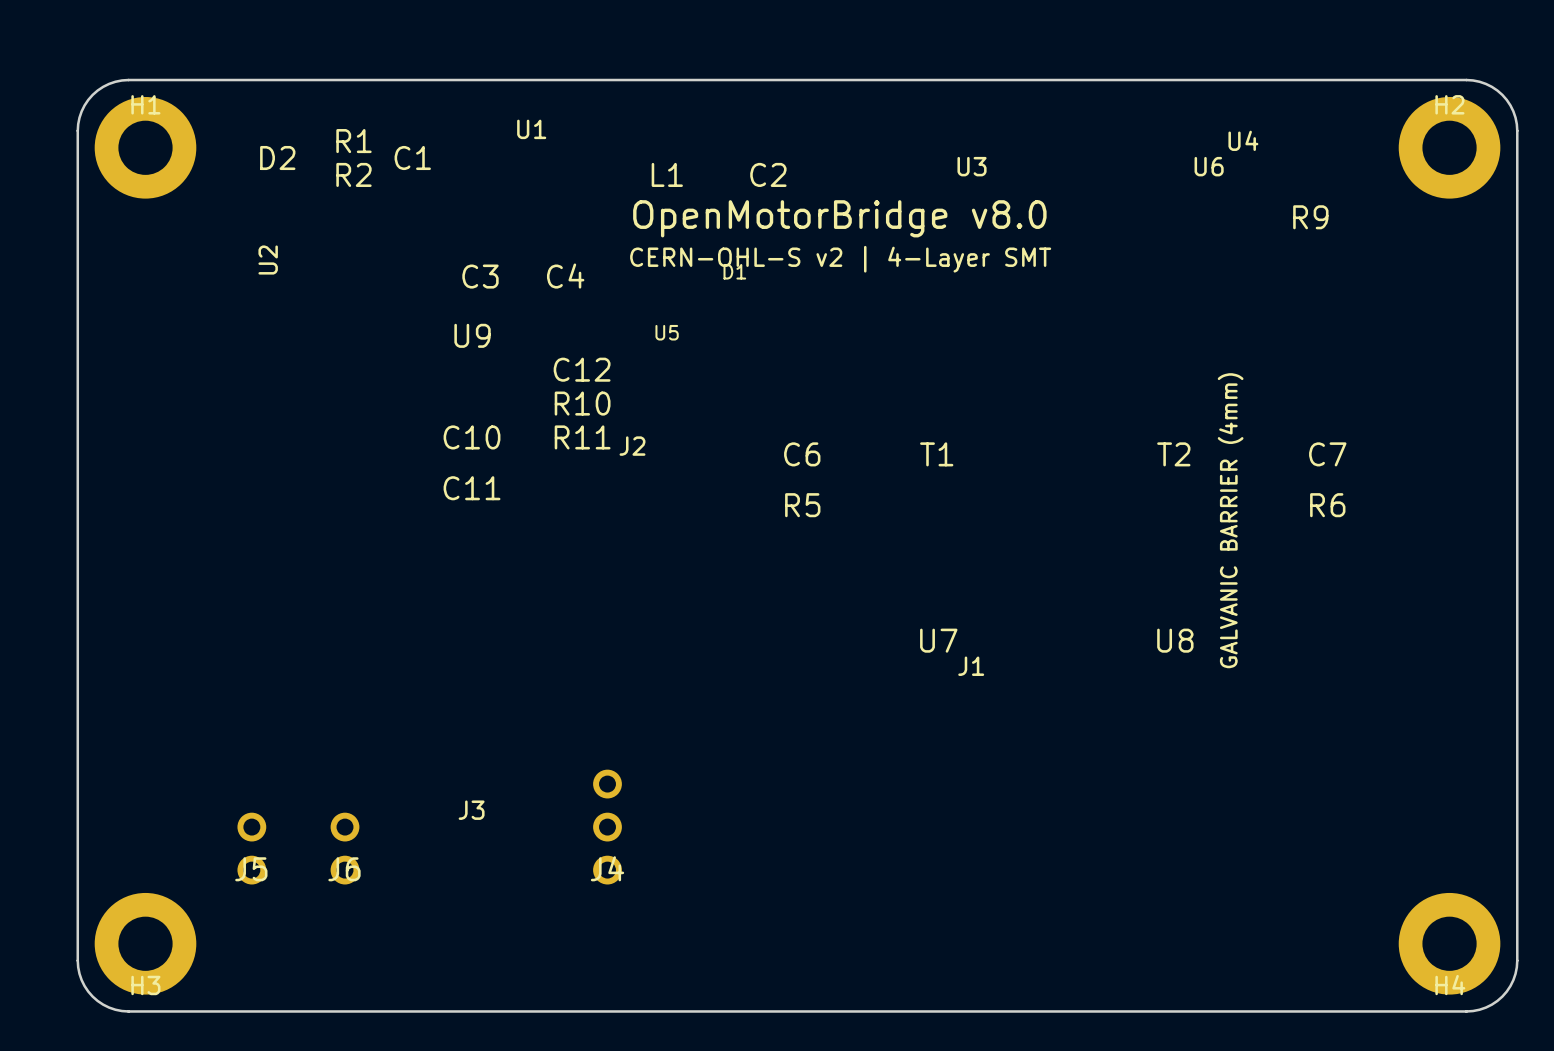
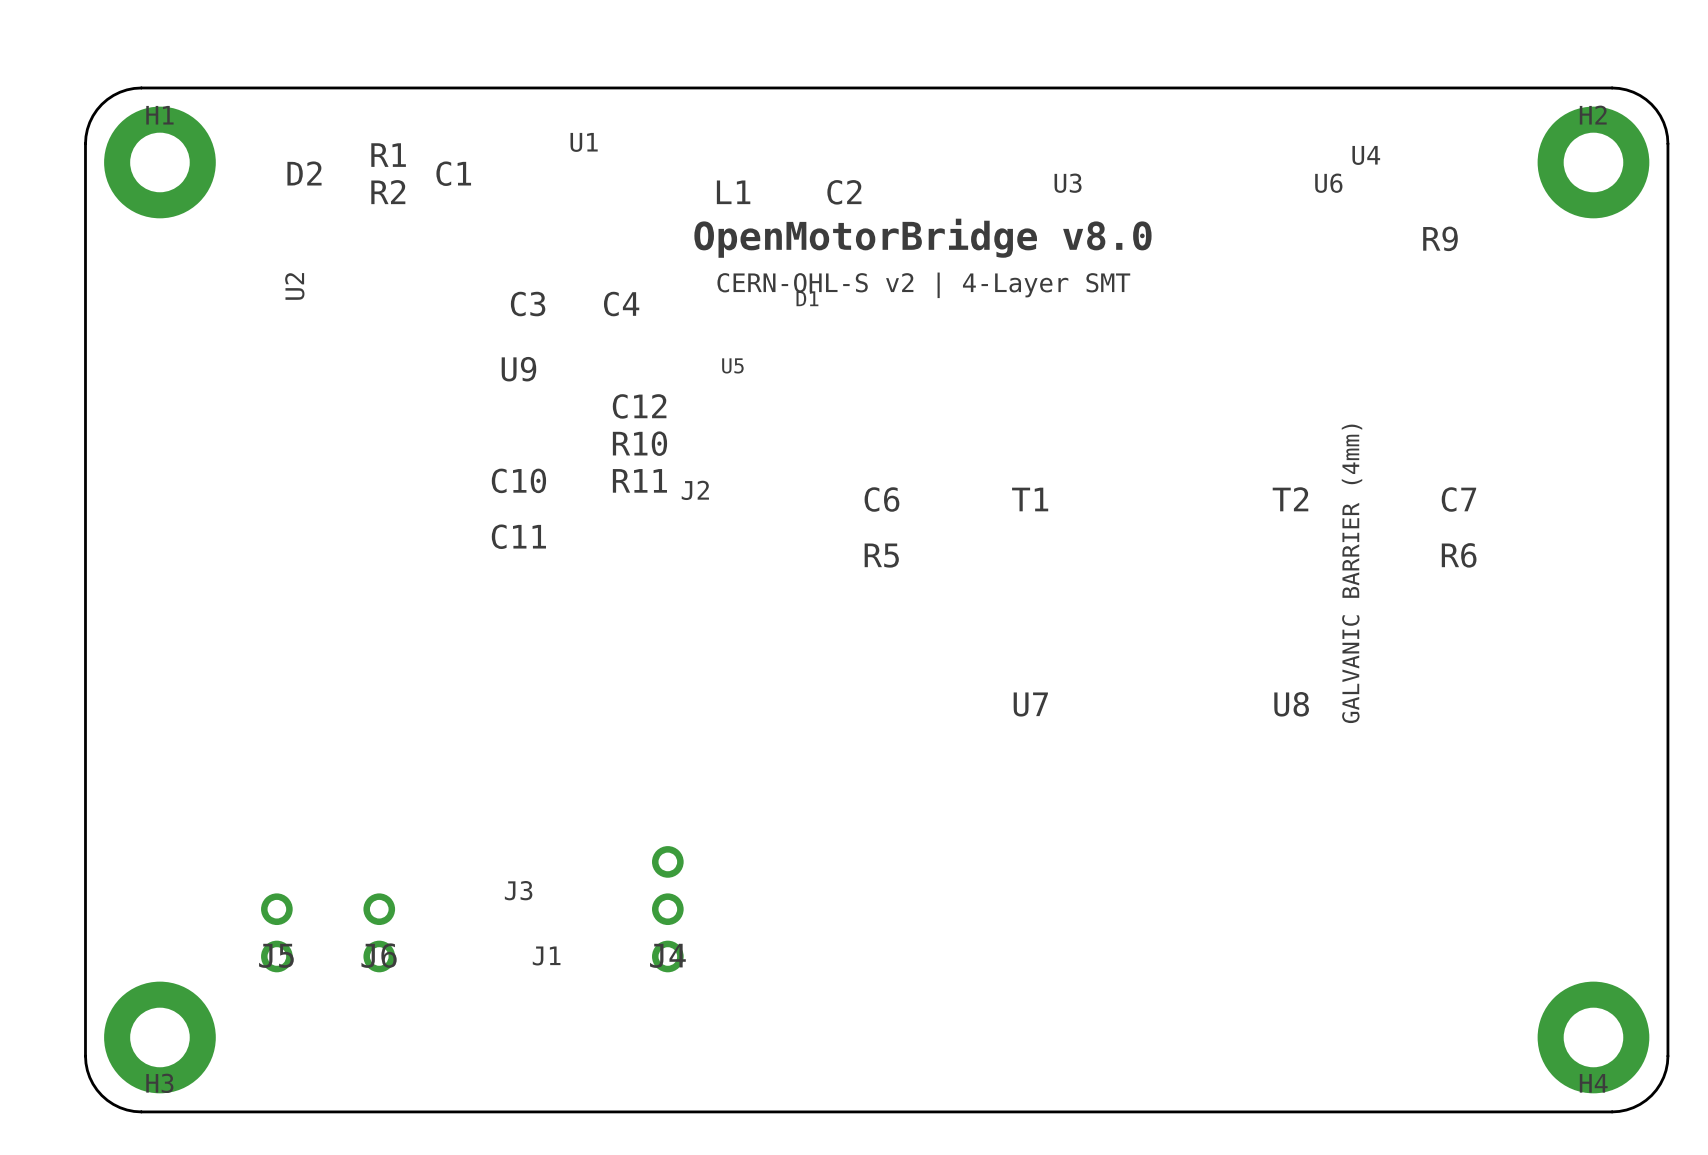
J1 position: (971, 666) -> (546, 955)

